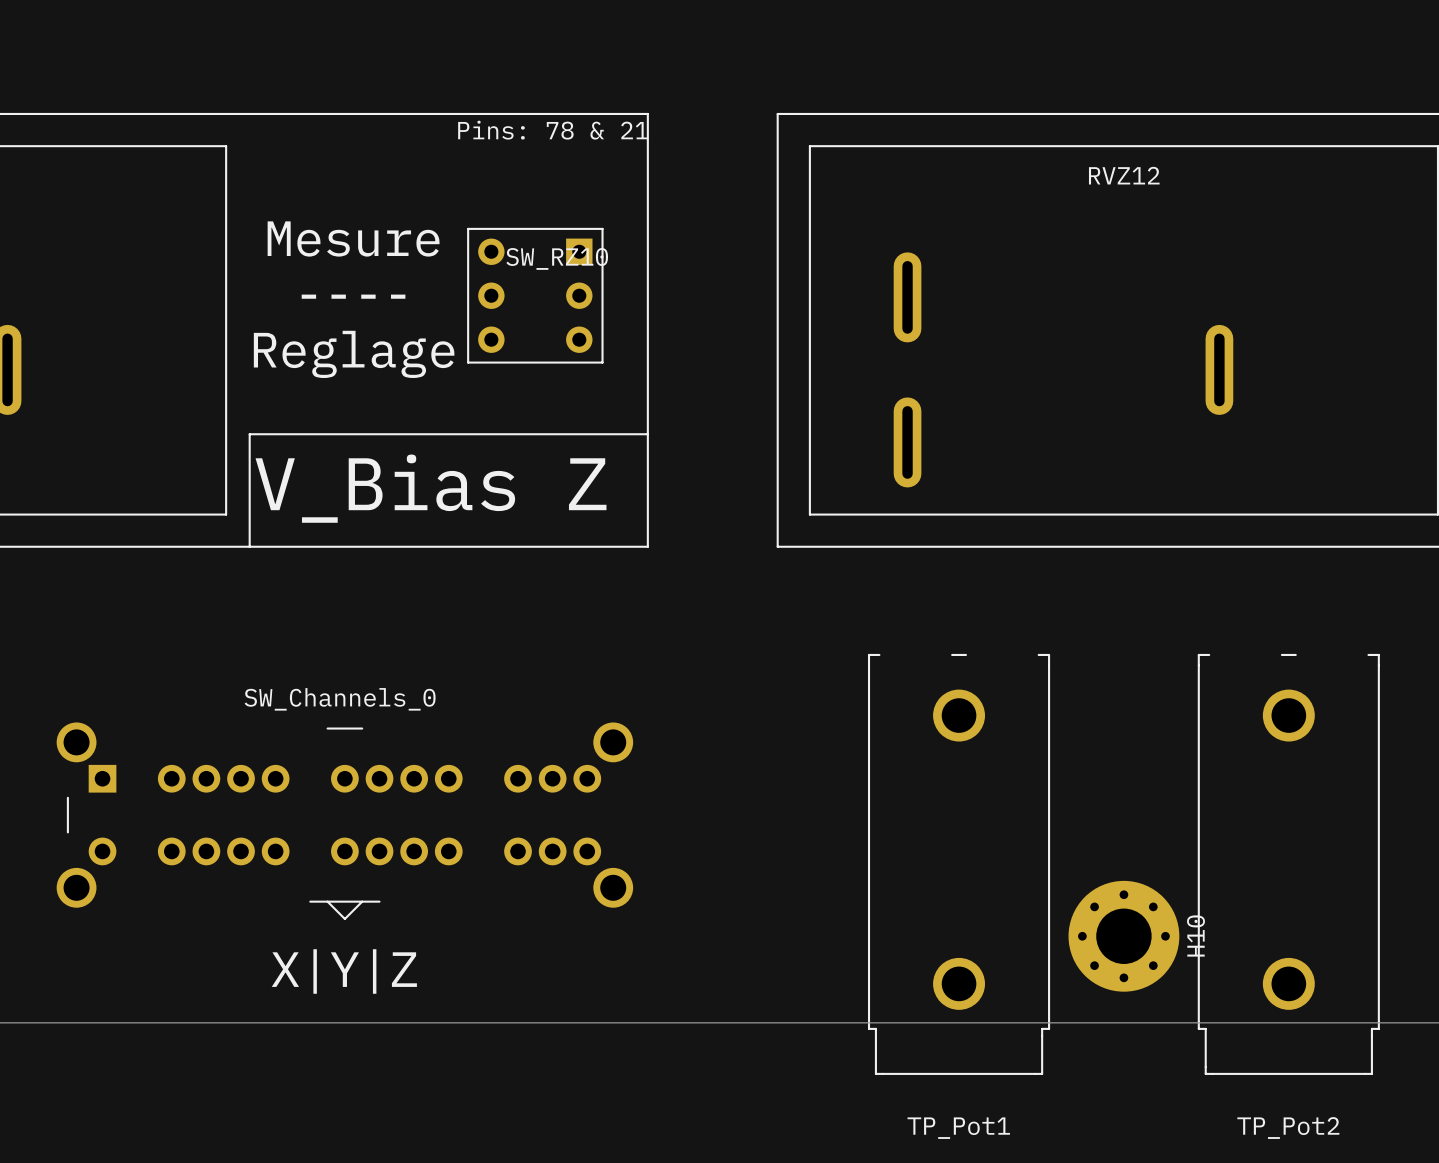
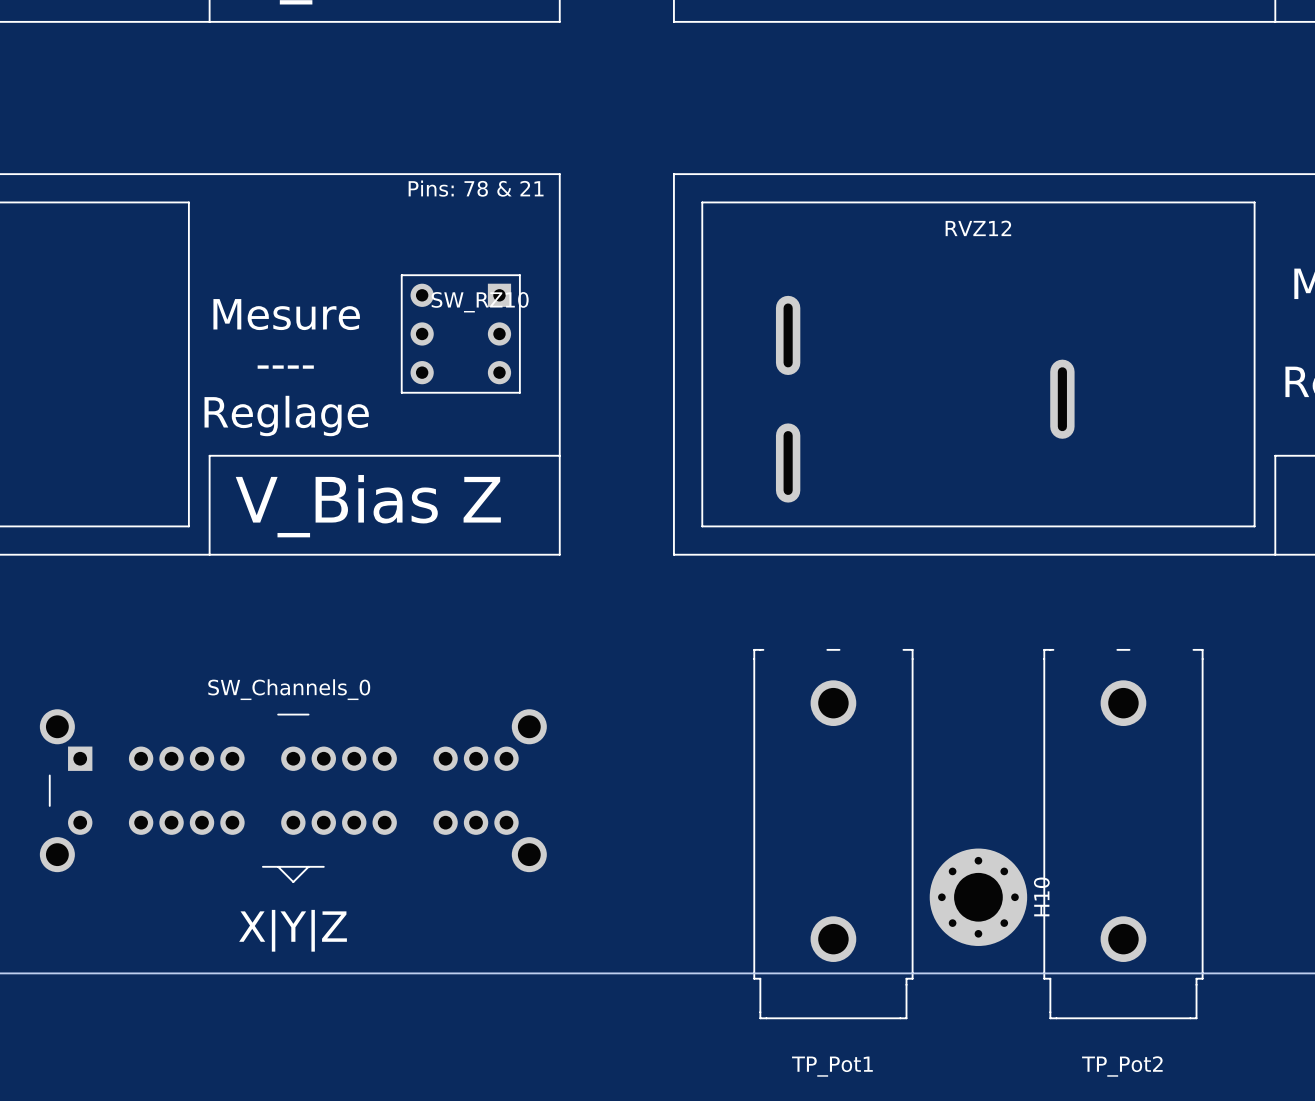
text position: Mesure (353, 238) -> Mesure (286, 314)
text position: ---- (353, 296) -> ---- (285, 367)
text position: Reglage (354, 354) -> Reglage (286, 416)

